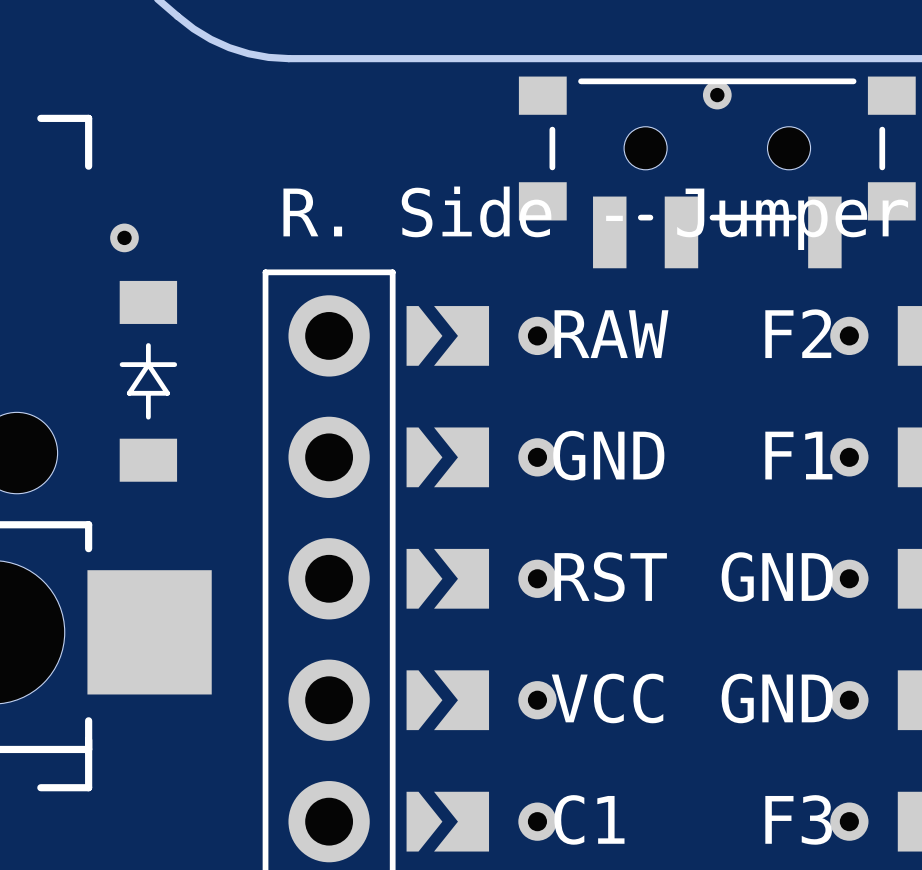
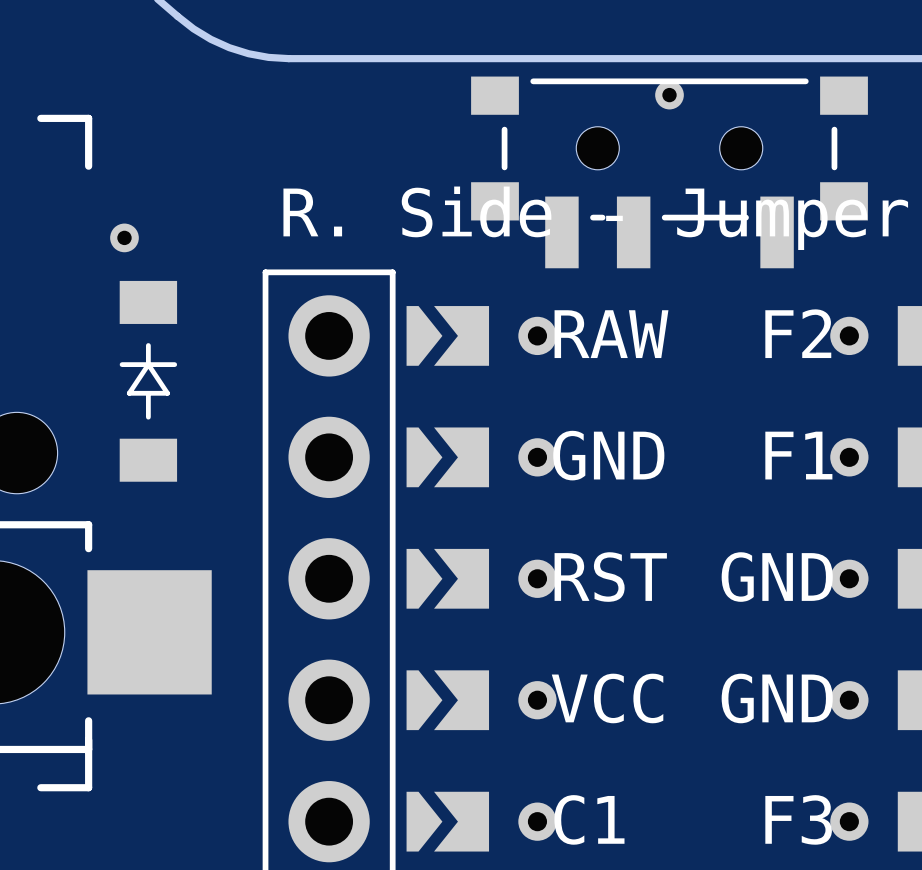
part position: (717, 95) -> (669, 95)
part position: (717, 172) -> (669, 172)

